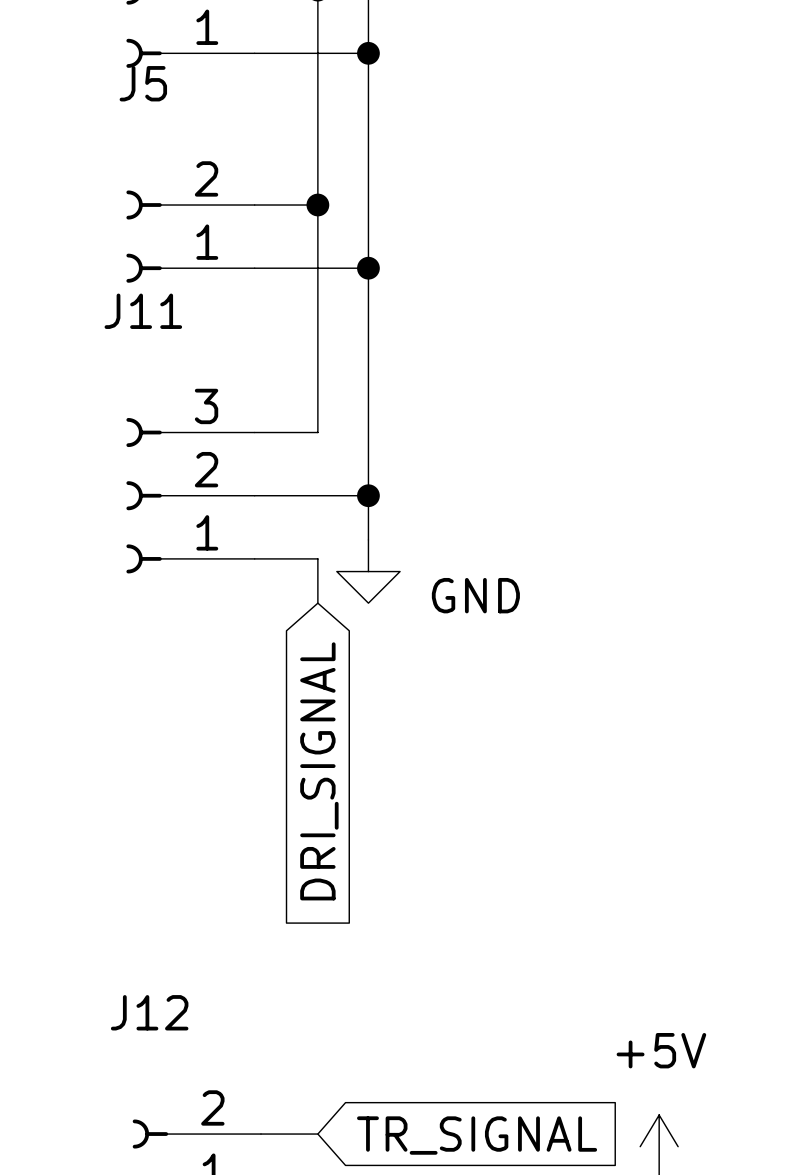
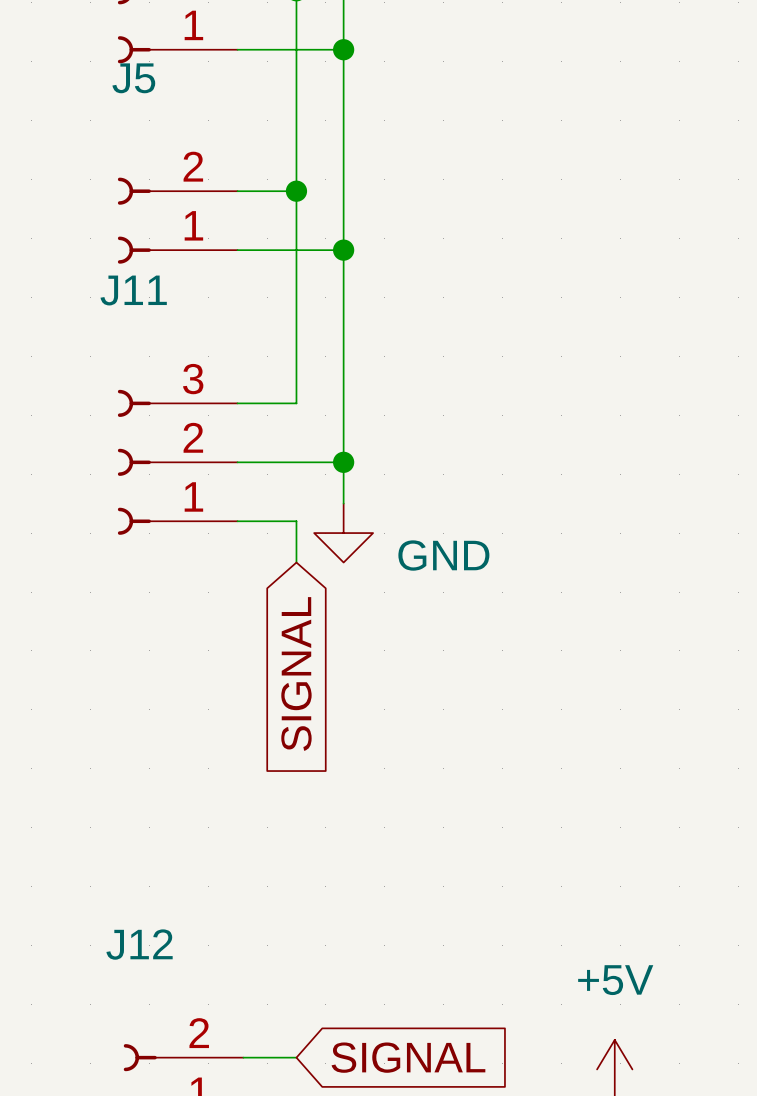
global label: DRI_SIGNAL (319, 771) -> SIGNAL (296, 673)
global label: TR_SIGNAL (477, 1135) -> SIGNAL (408, 1057)

